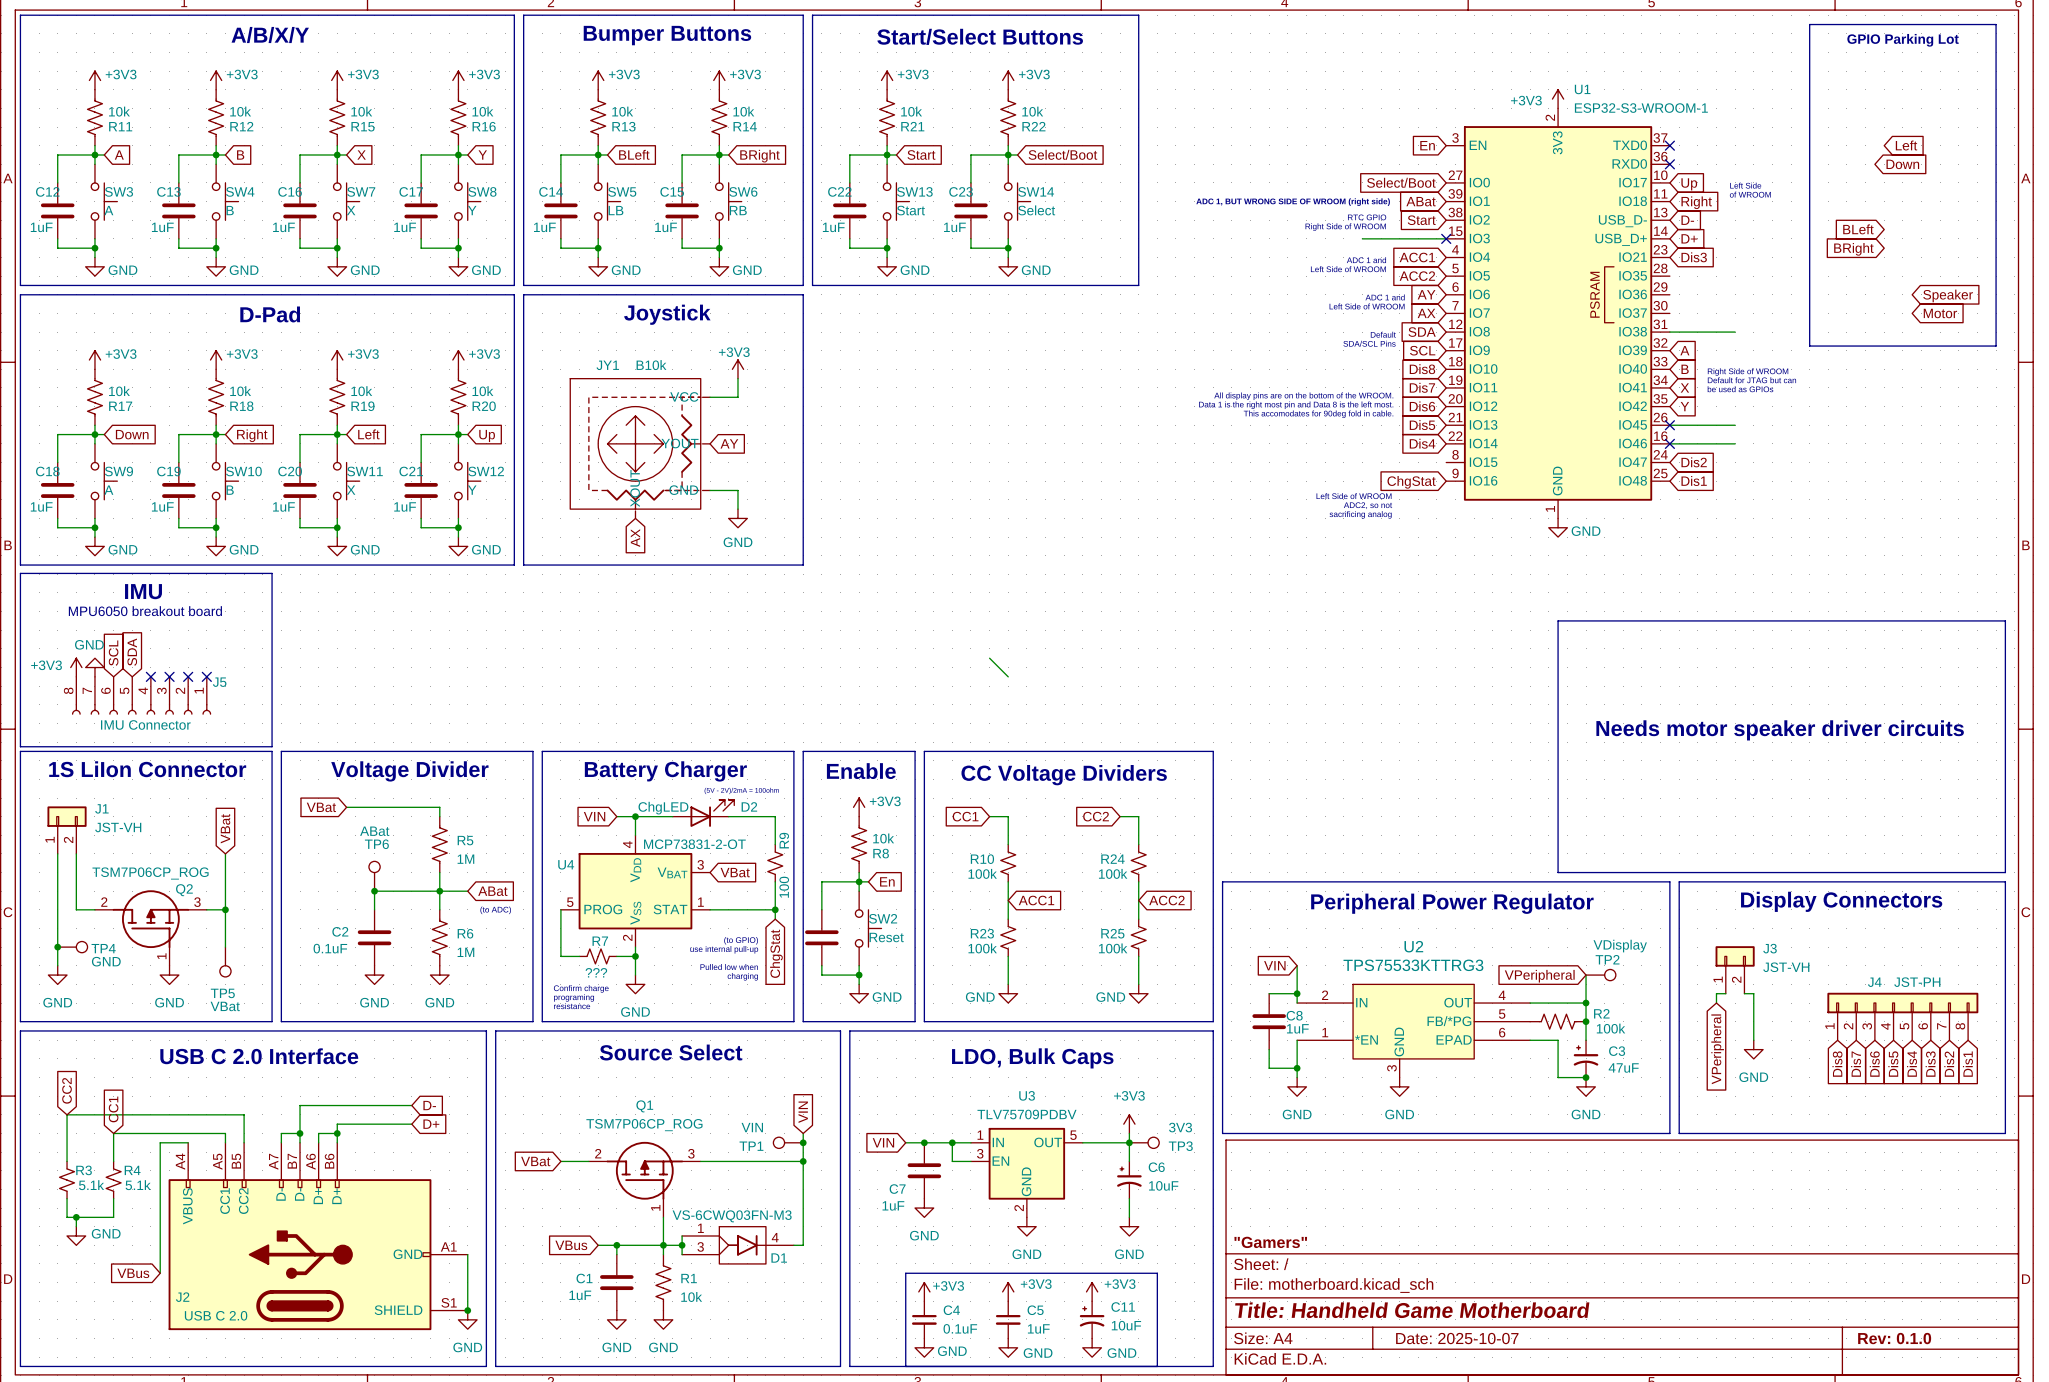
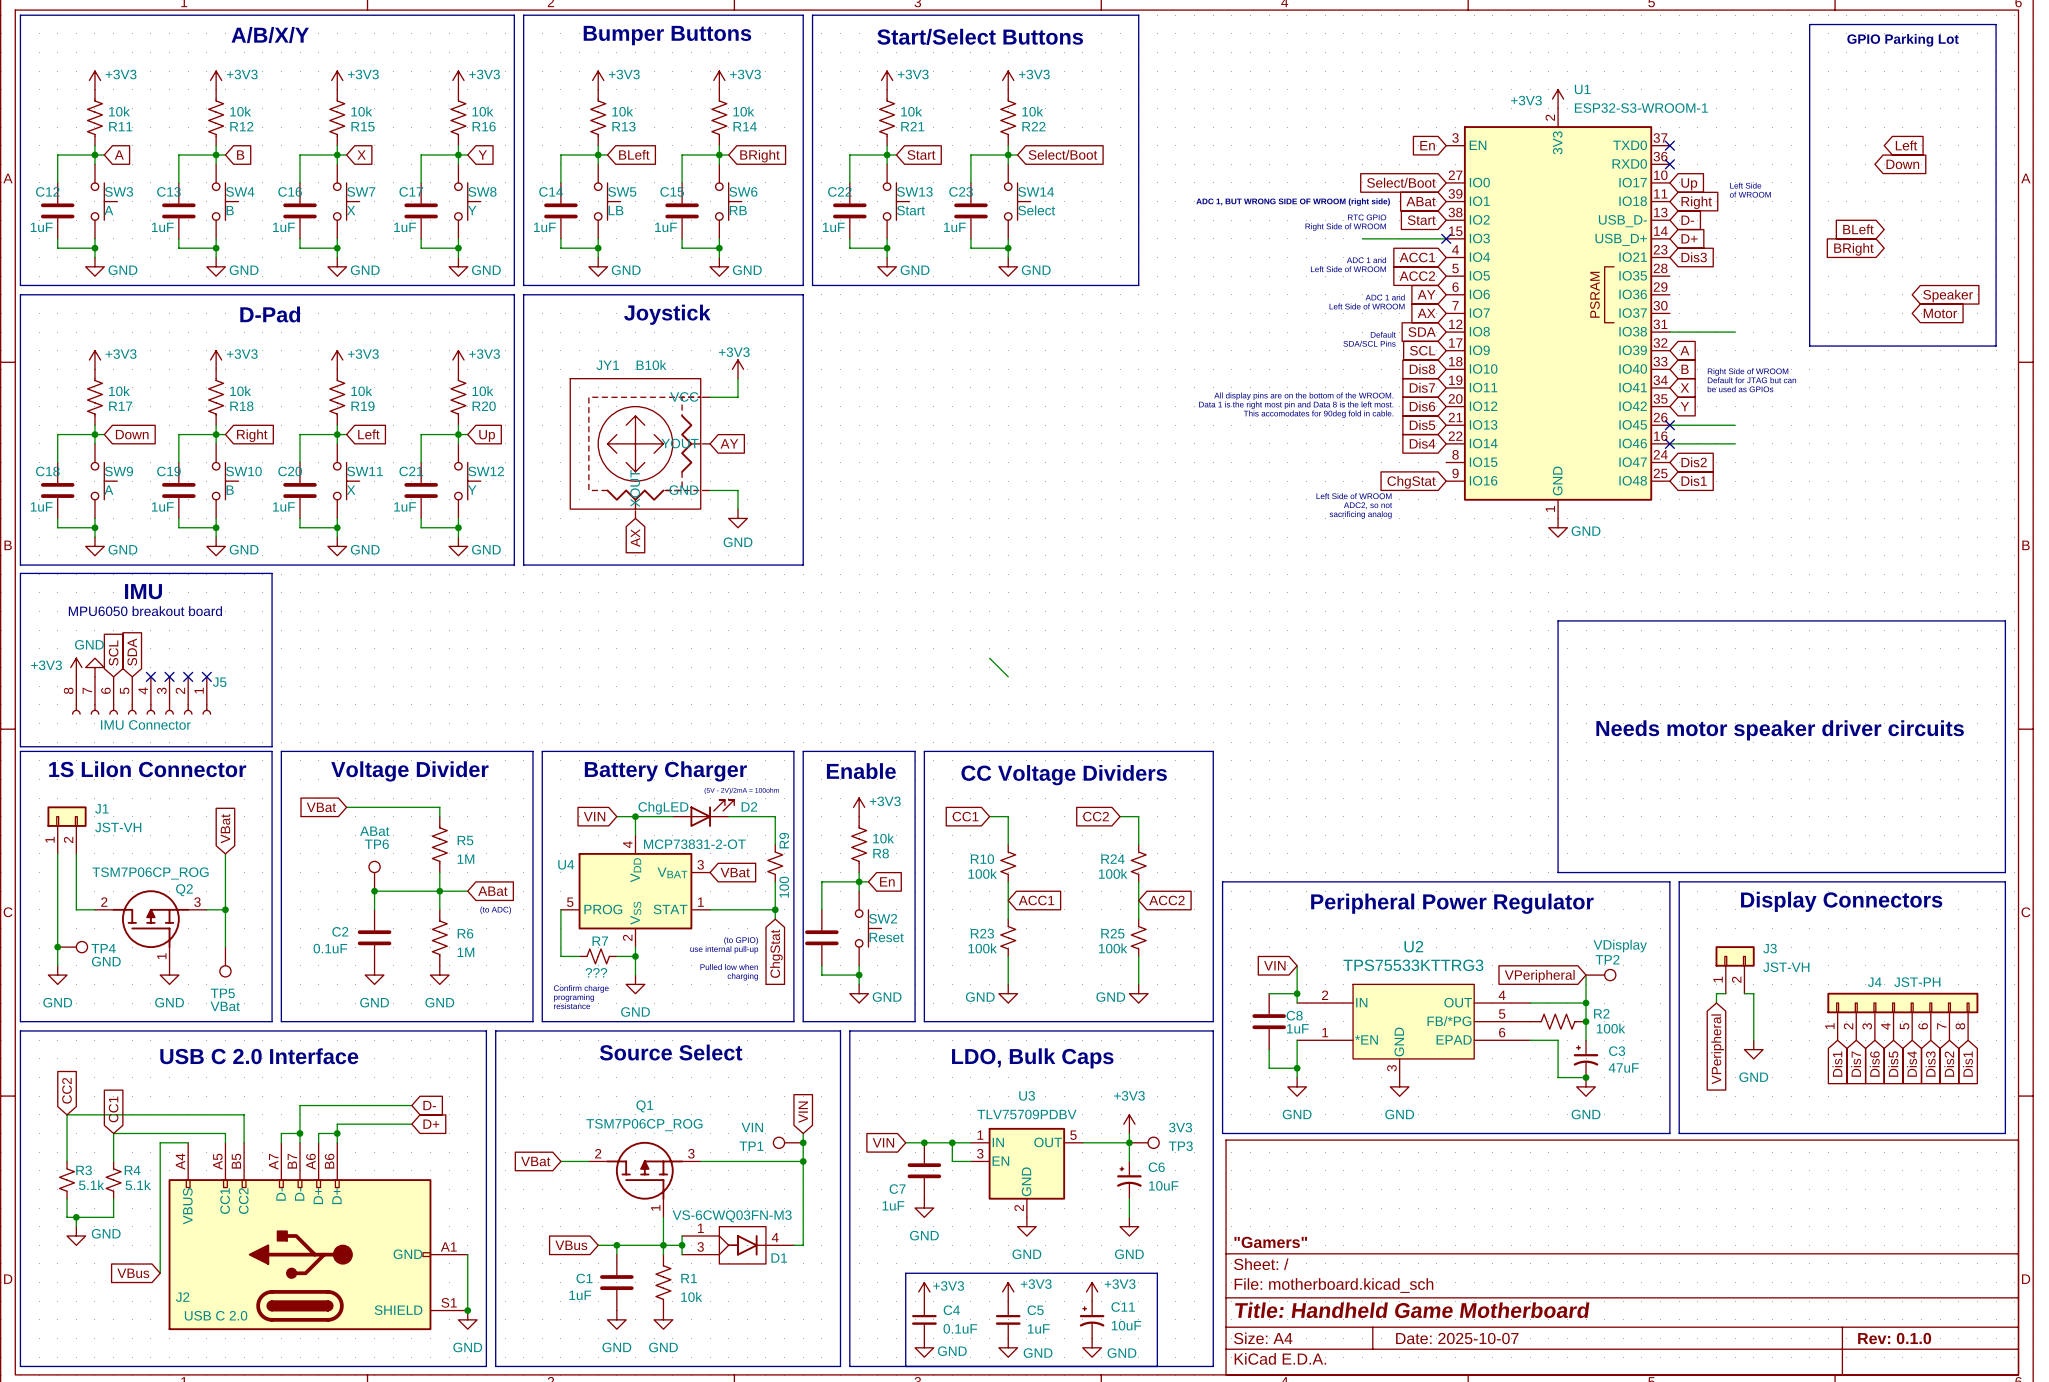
global label: Dis8 (1837, 1064) -> Dis1 (1837, 1064)

